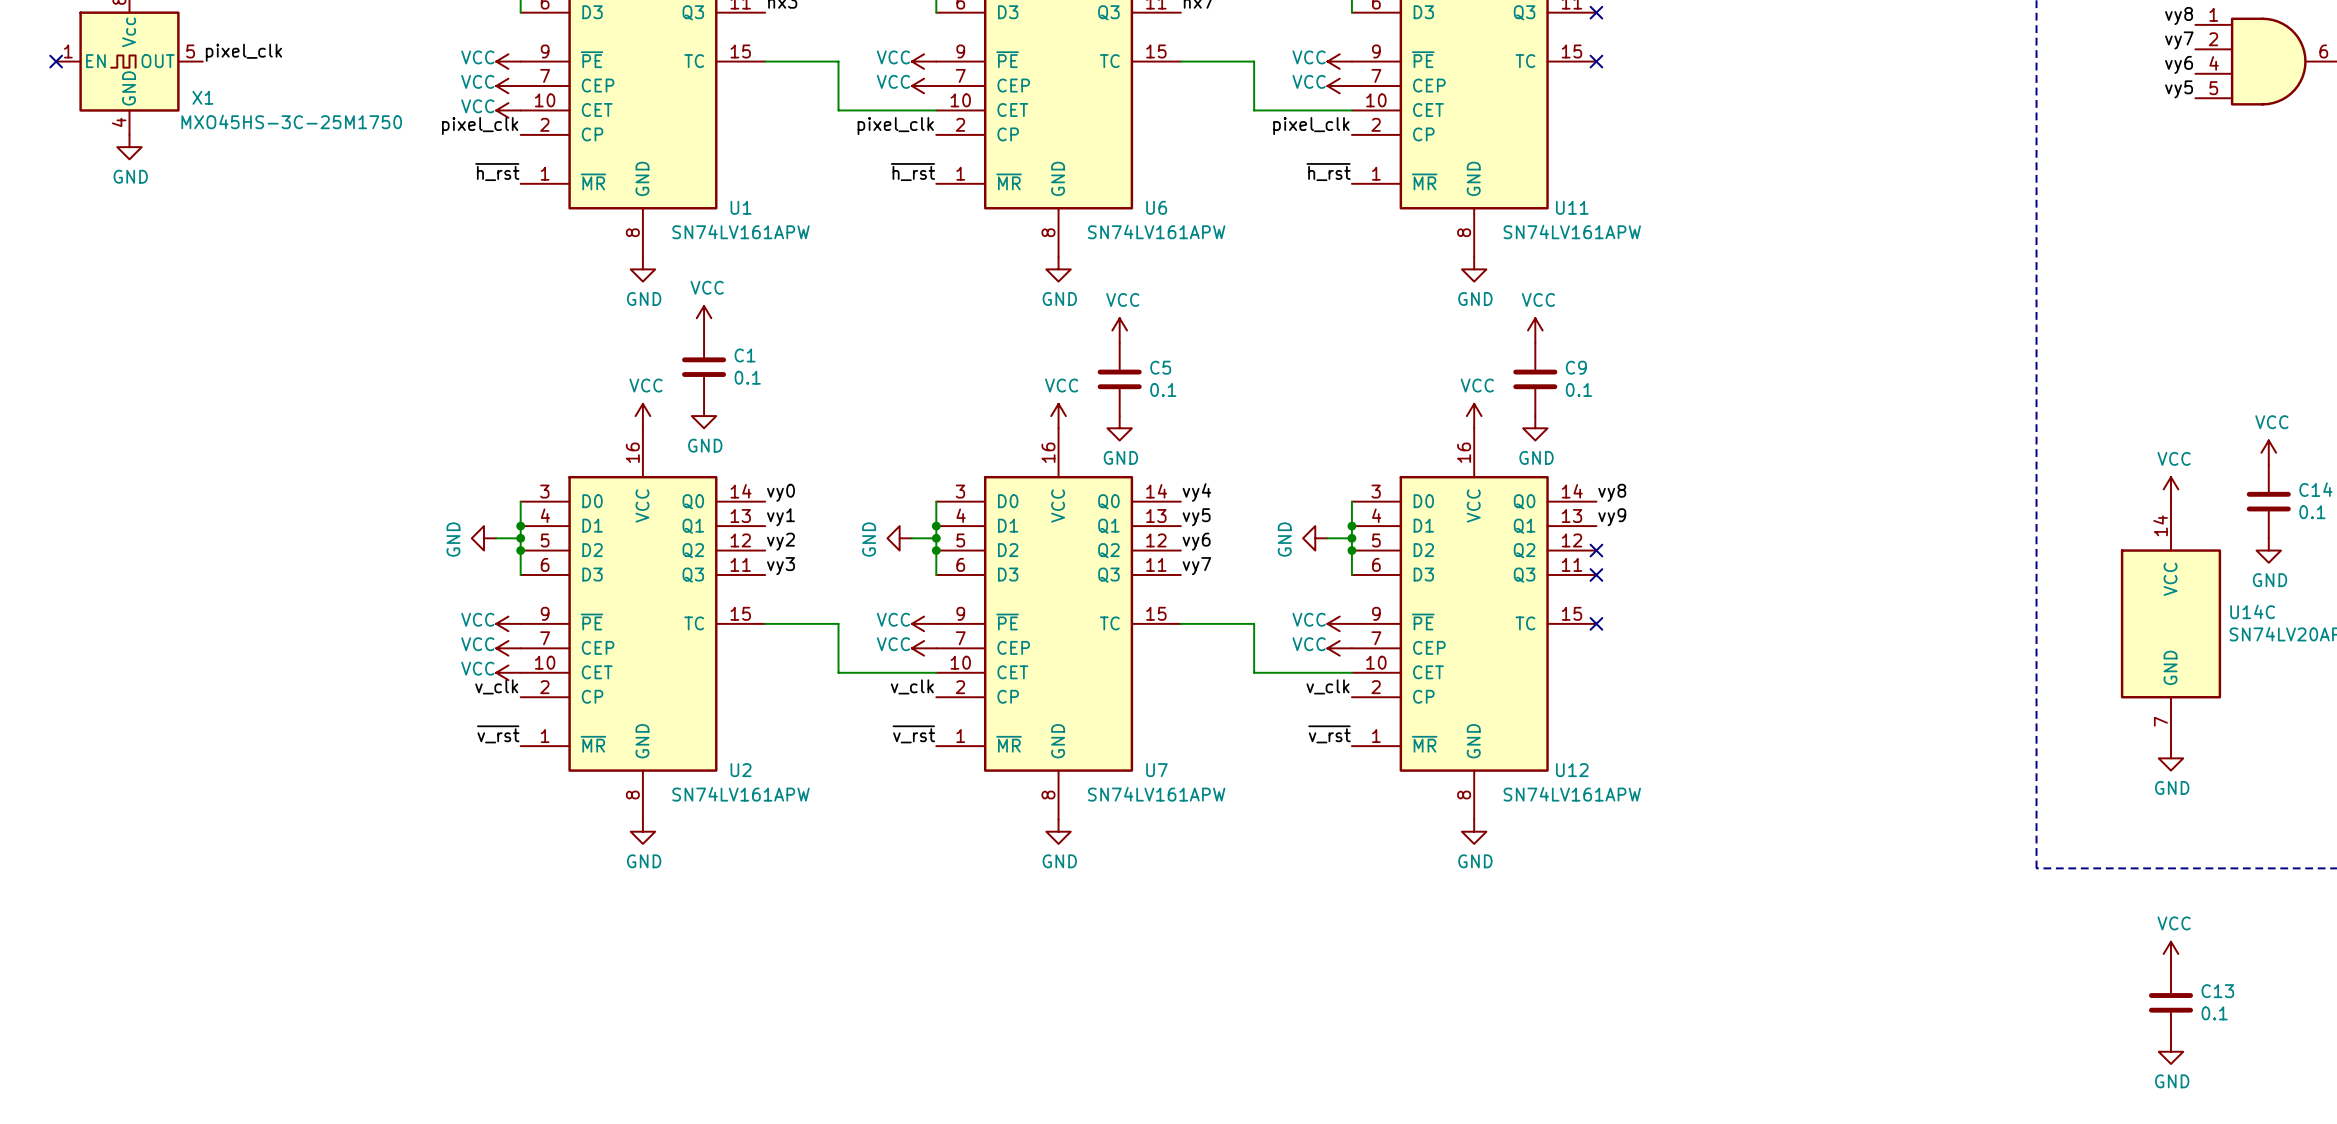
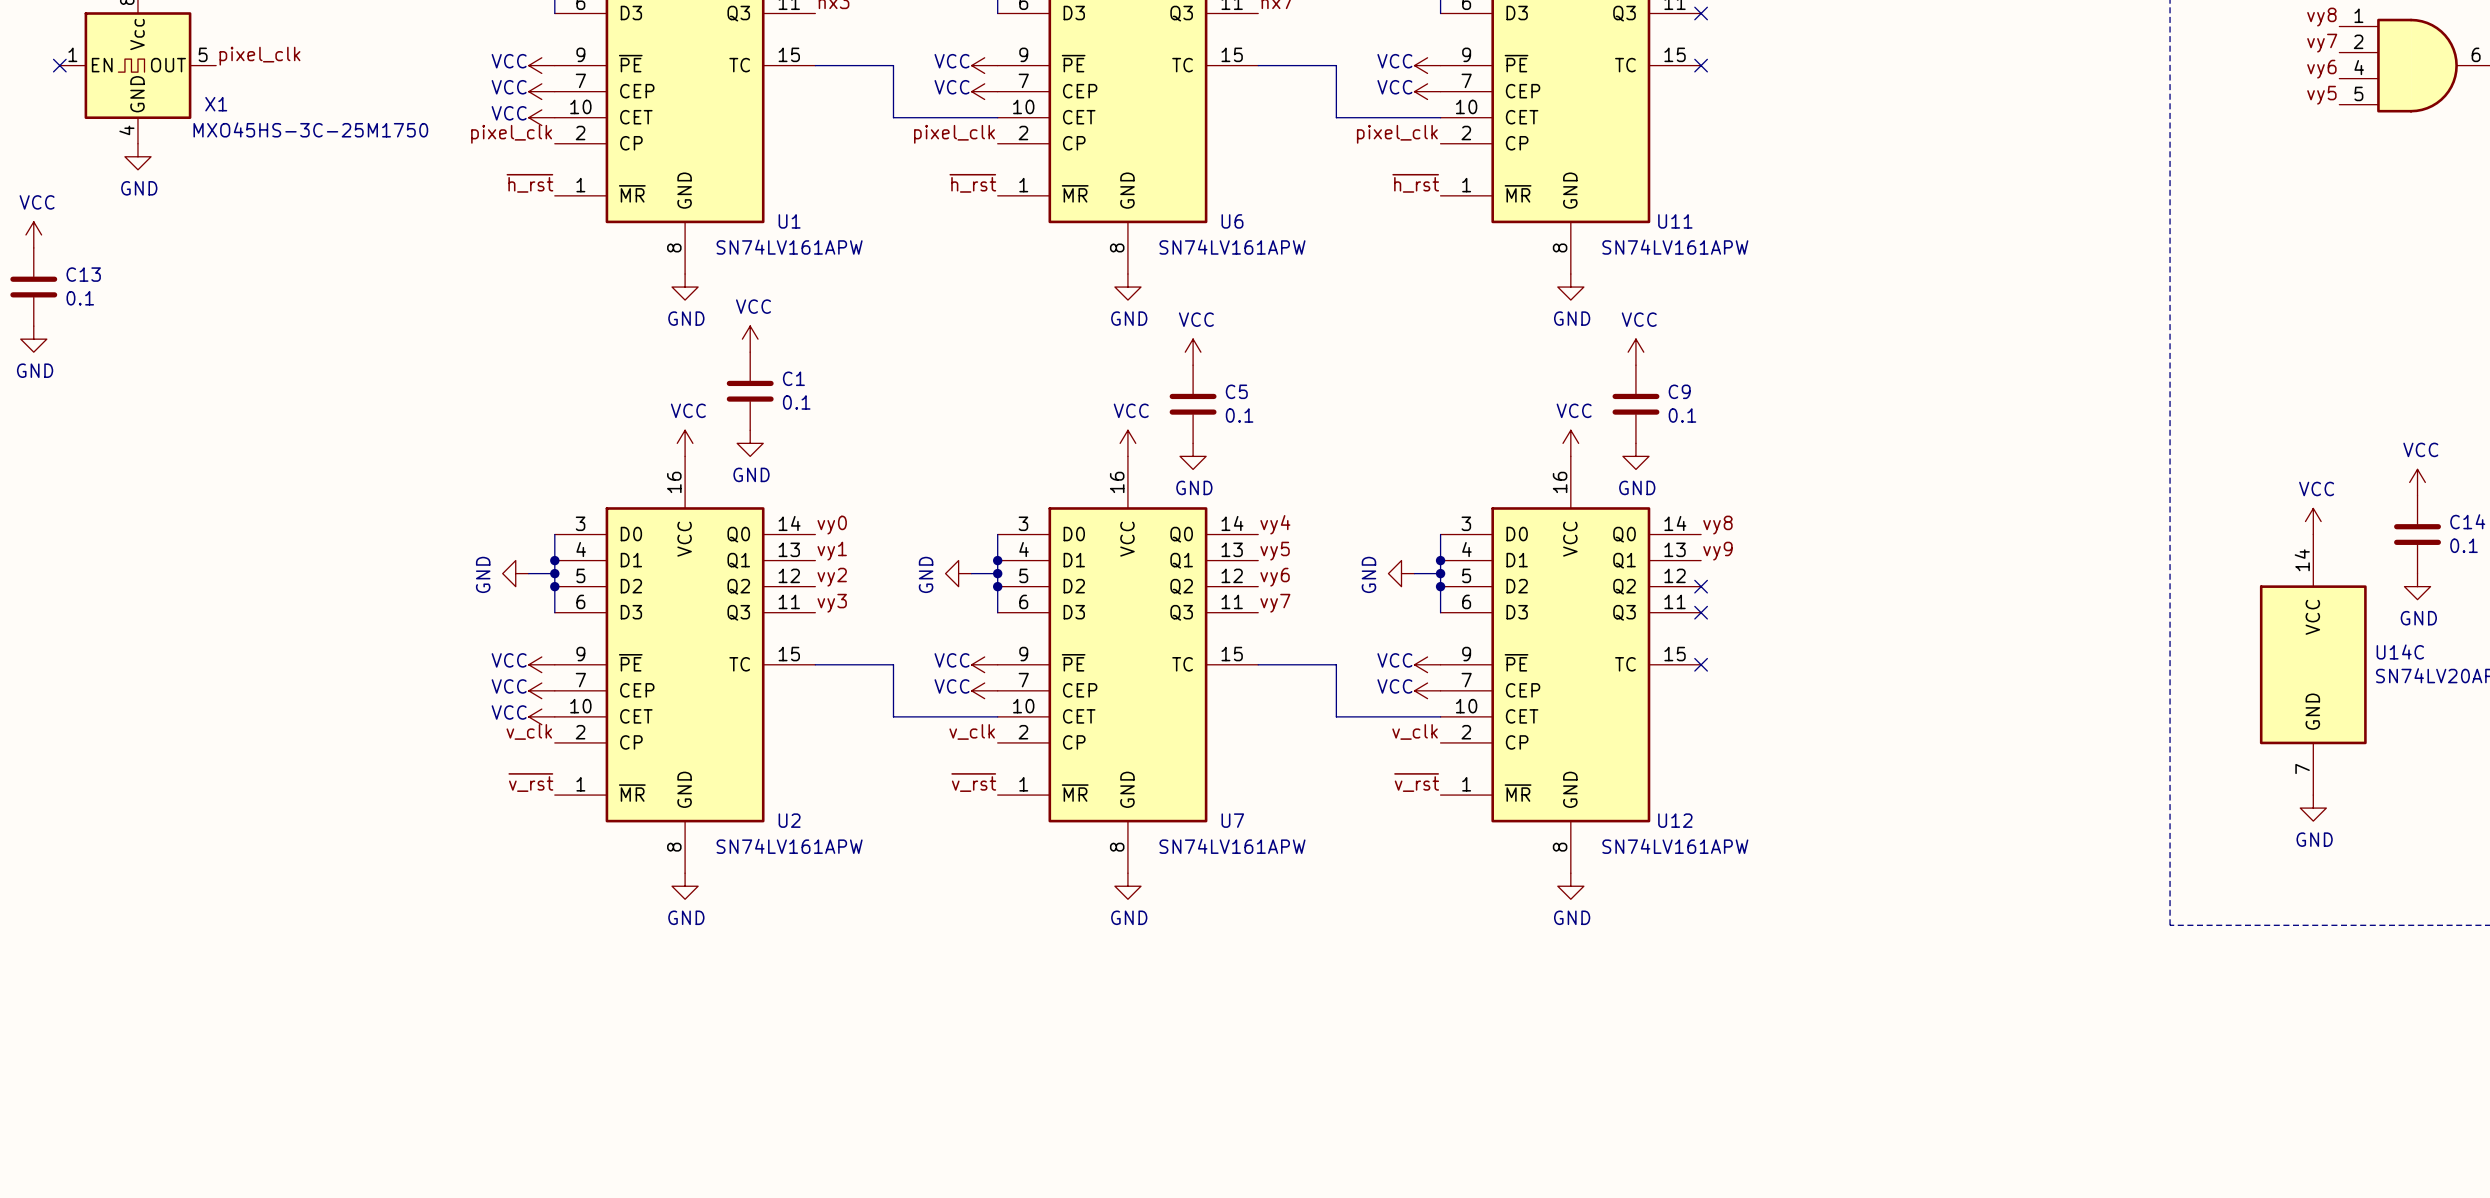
power symbol: none -> VCC (33, 234)
power symbol: none -> GND (33, 339)
power symbol: VCC (2170, 953) -> none
C13 position: (2170, 1002) -> (33, 287)
power symbol: GND (2170, 1051) -> none

